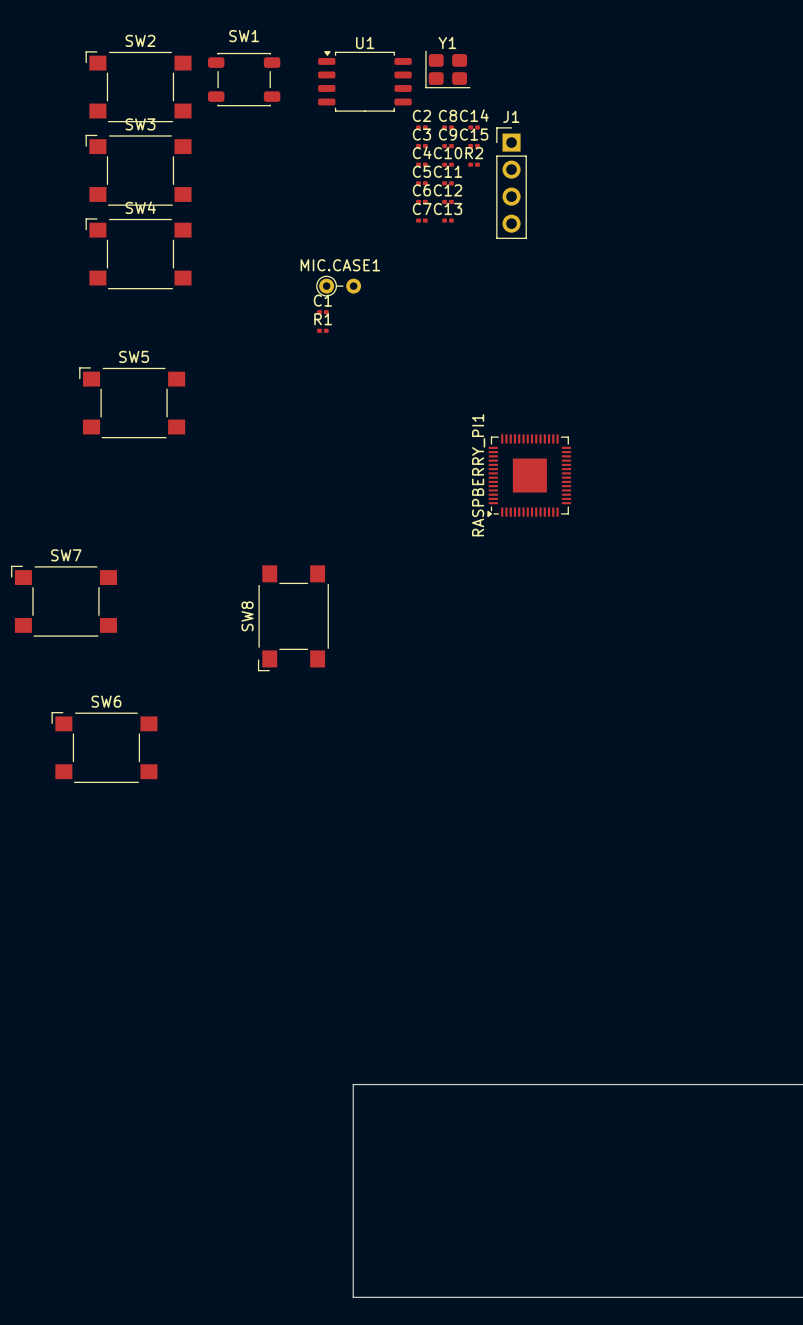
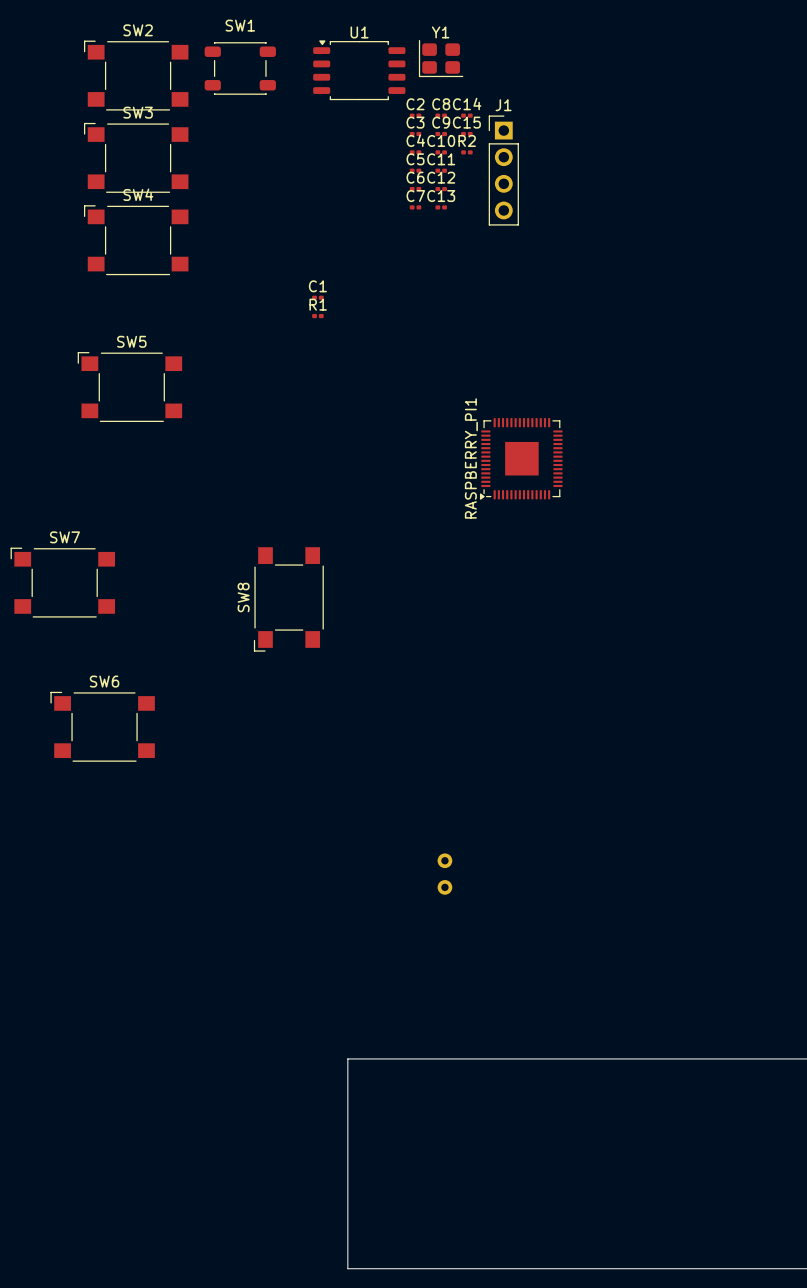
MIC.CASE1: (338, 286) -> none
part: none -> (444, 874)

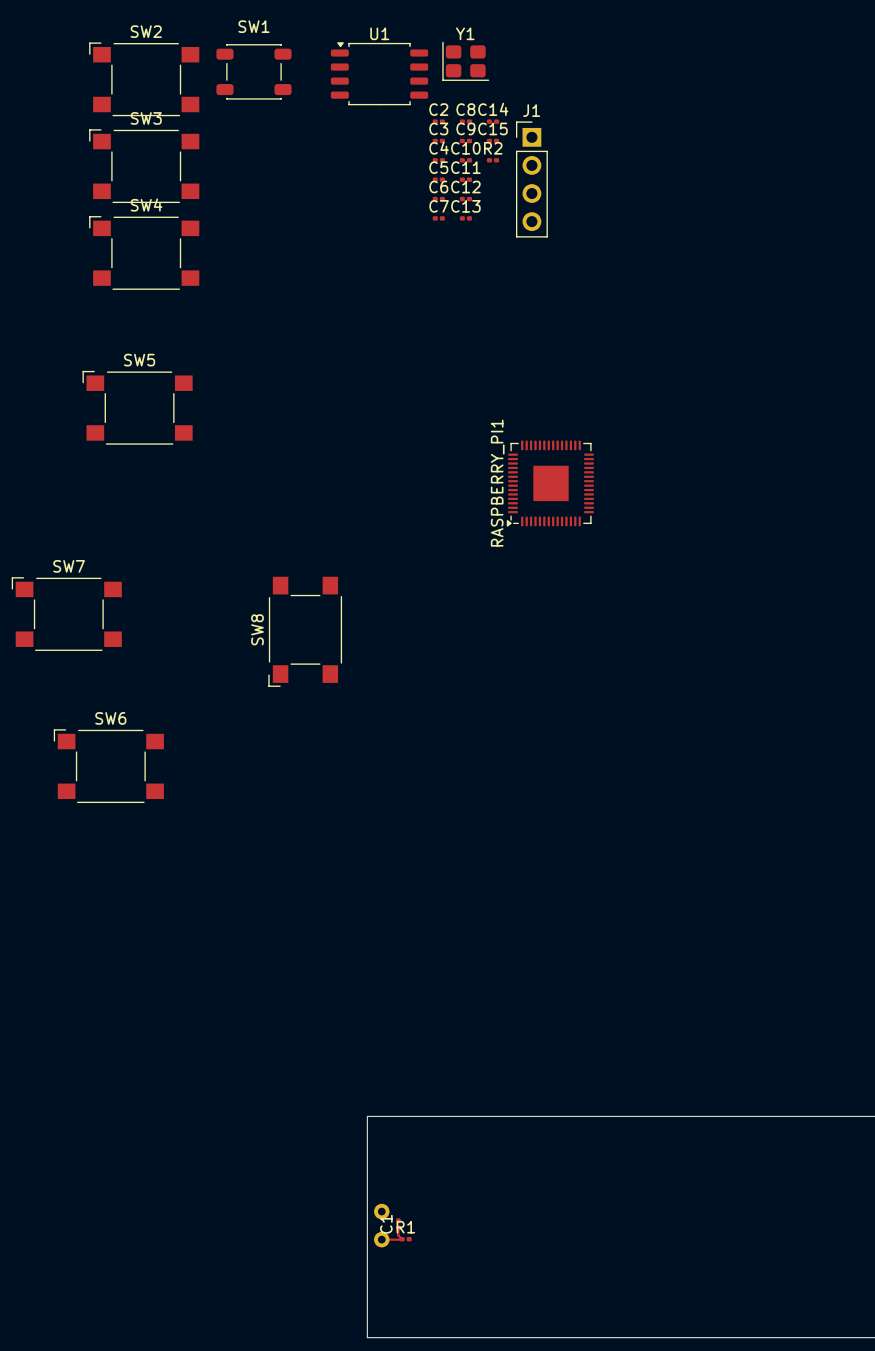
C1 rotation: 0° (317, 297) -> 90° clockwise (398, 1224)
C1 position: (317, 297) -> (398, 1224)
R1 position: (317, 316) -> (405, 1239)
part: (444, 874) -> none
part: none -> (381, 1225)
track: none -> (398, 1227) (398, 1235) (401, 1239) (381, 1239)

